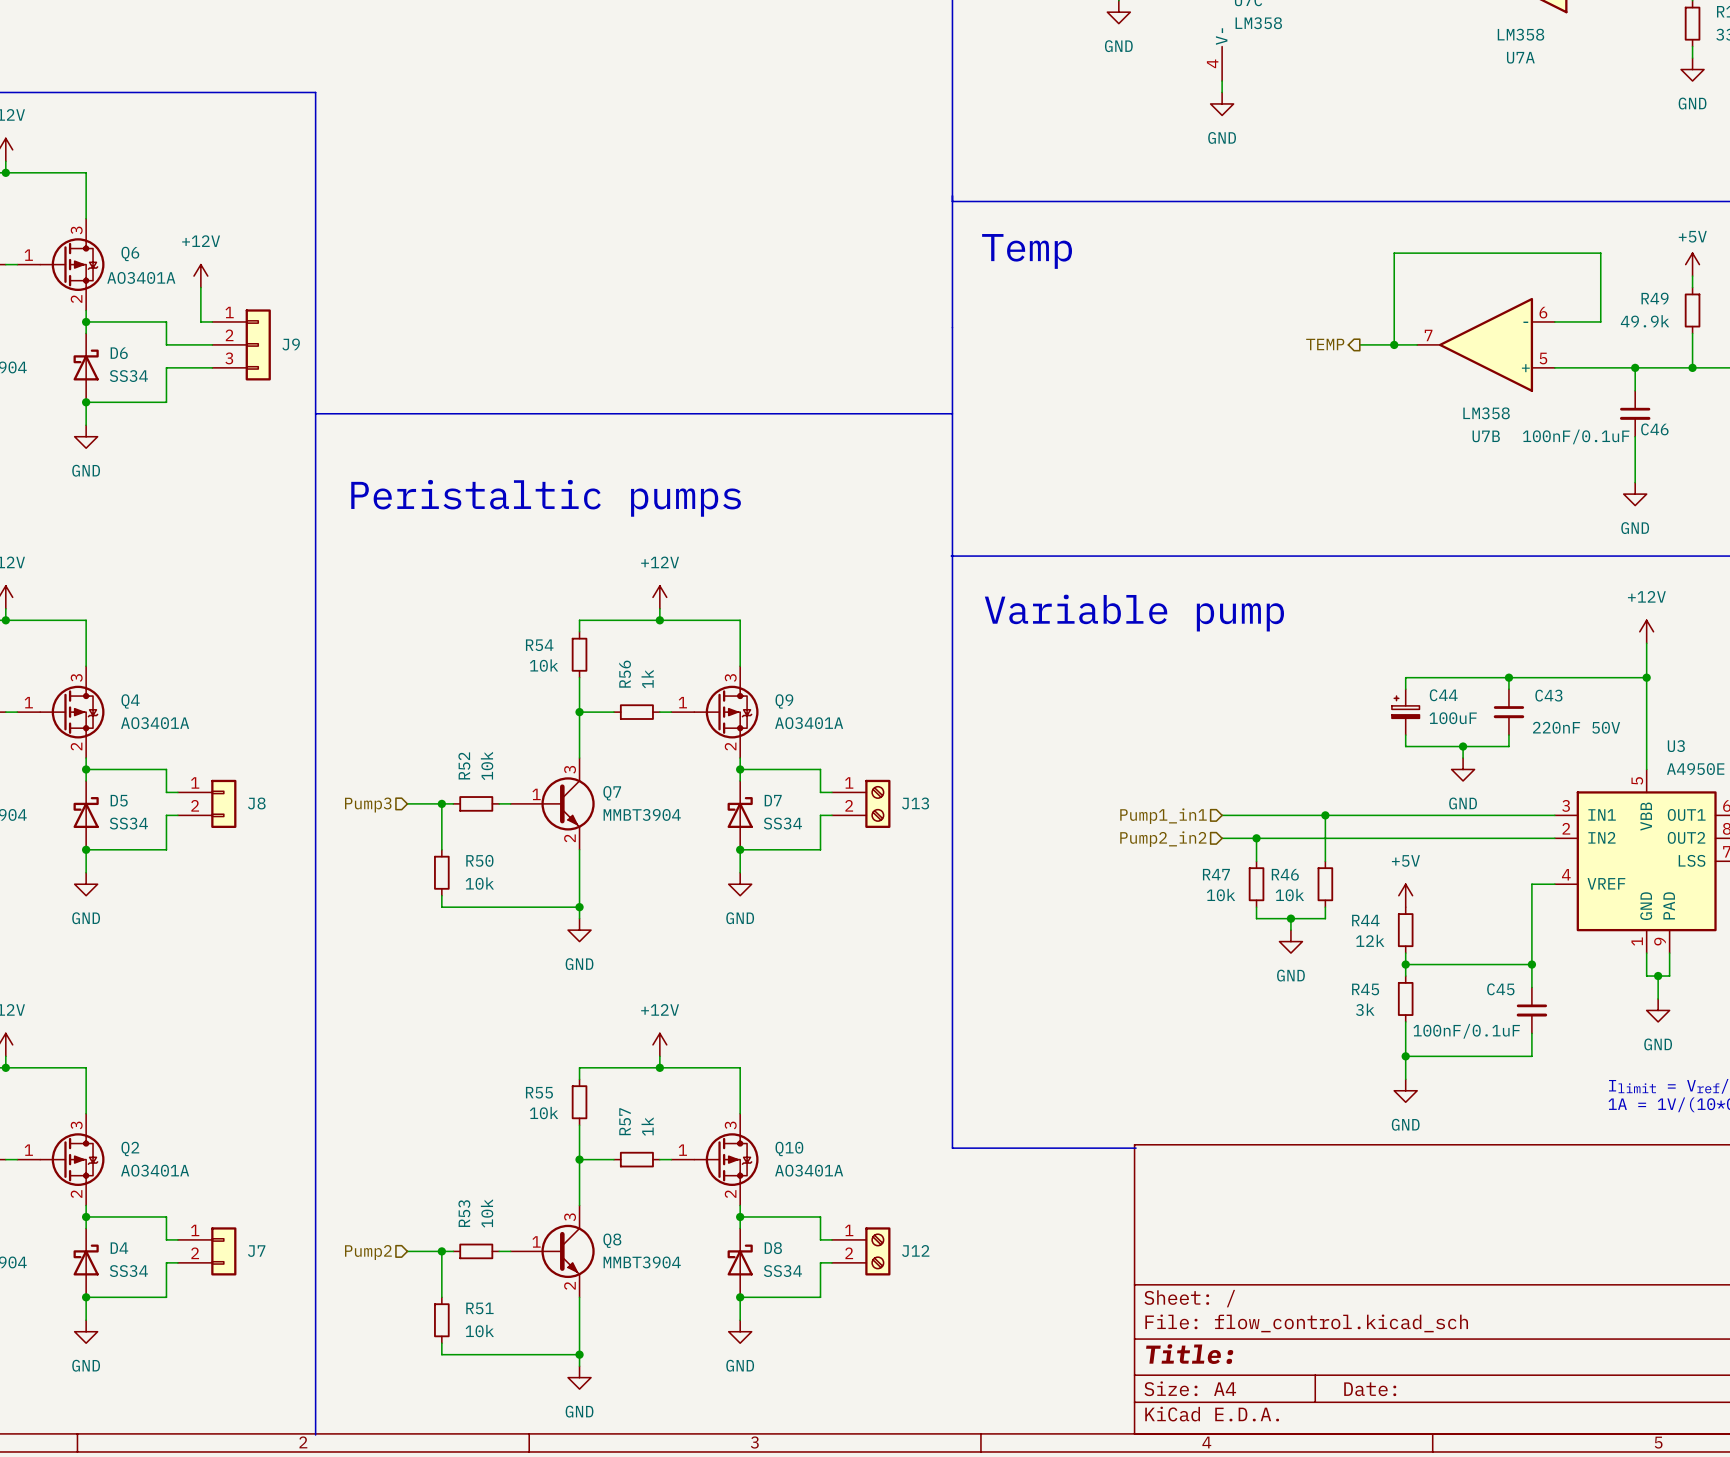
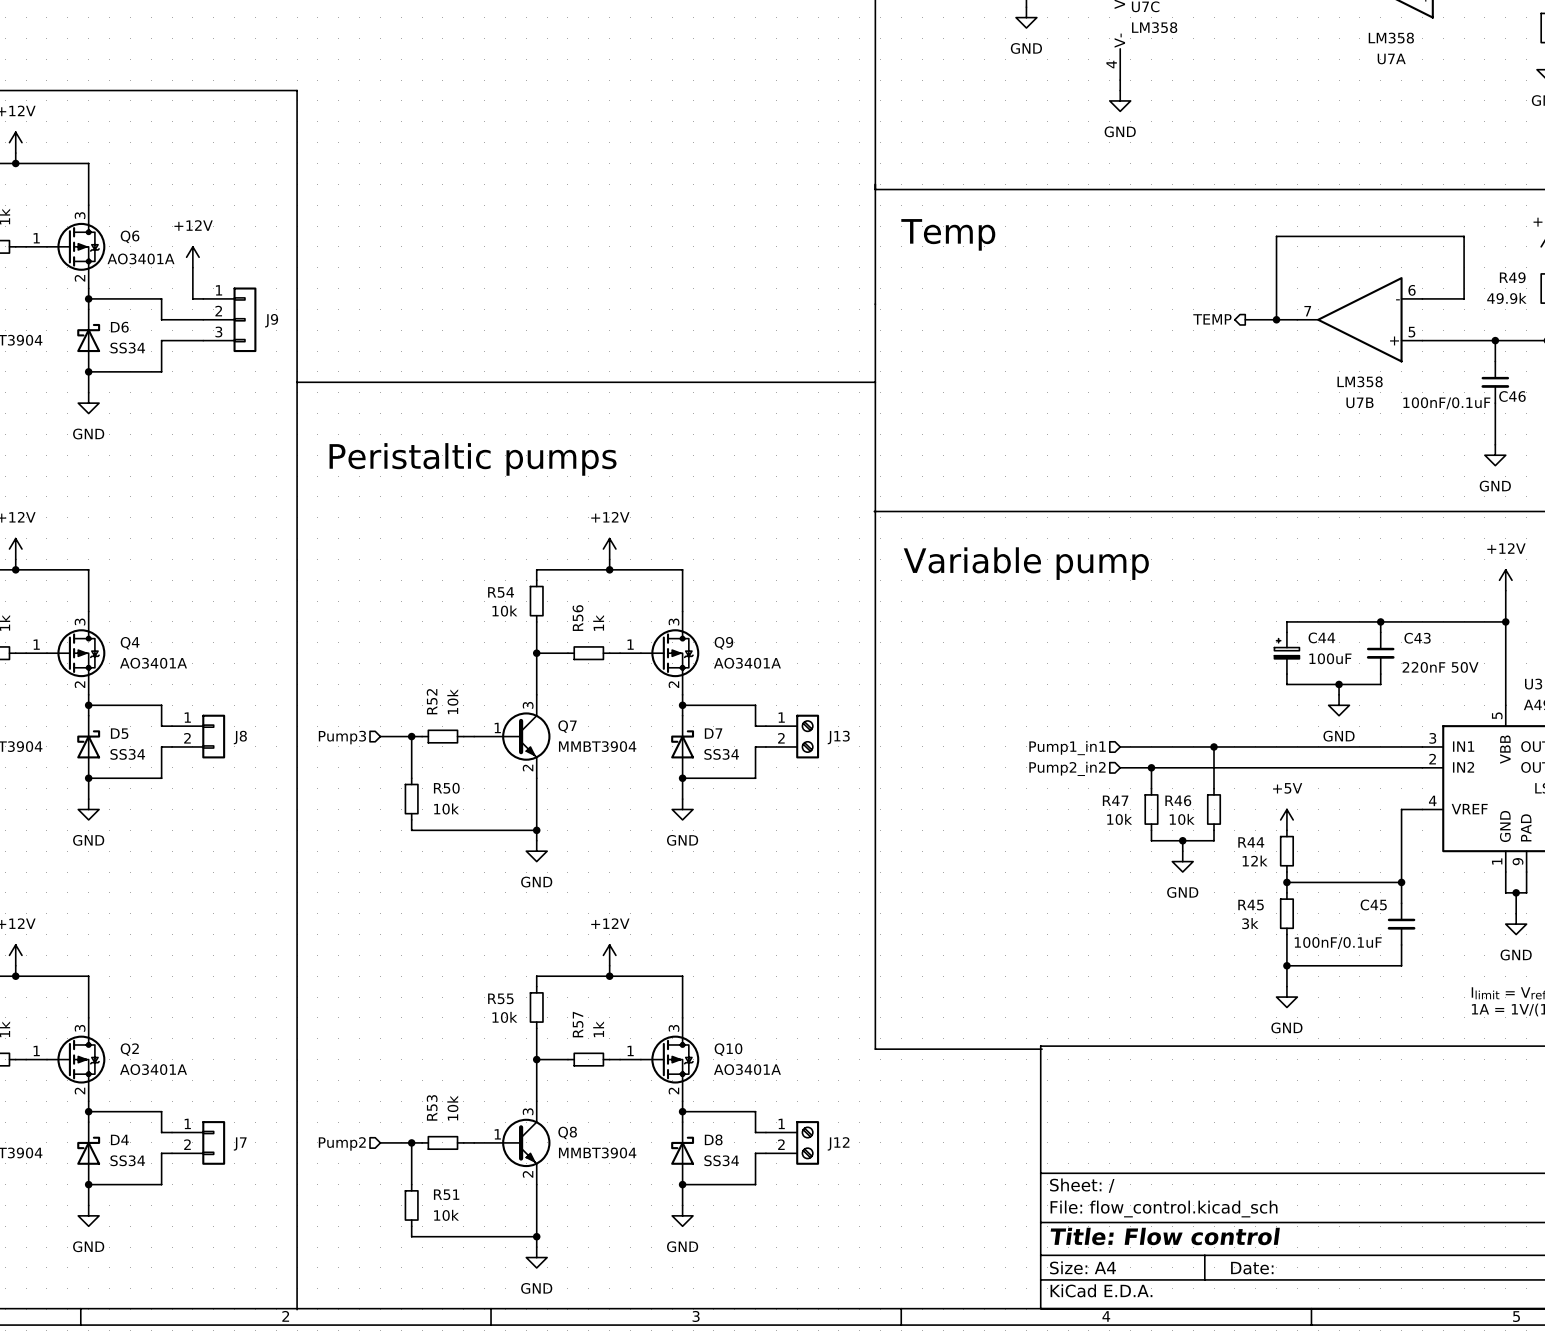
title block: Title: (1189, 1354) -> Title: Flow control (1165, 1236)

